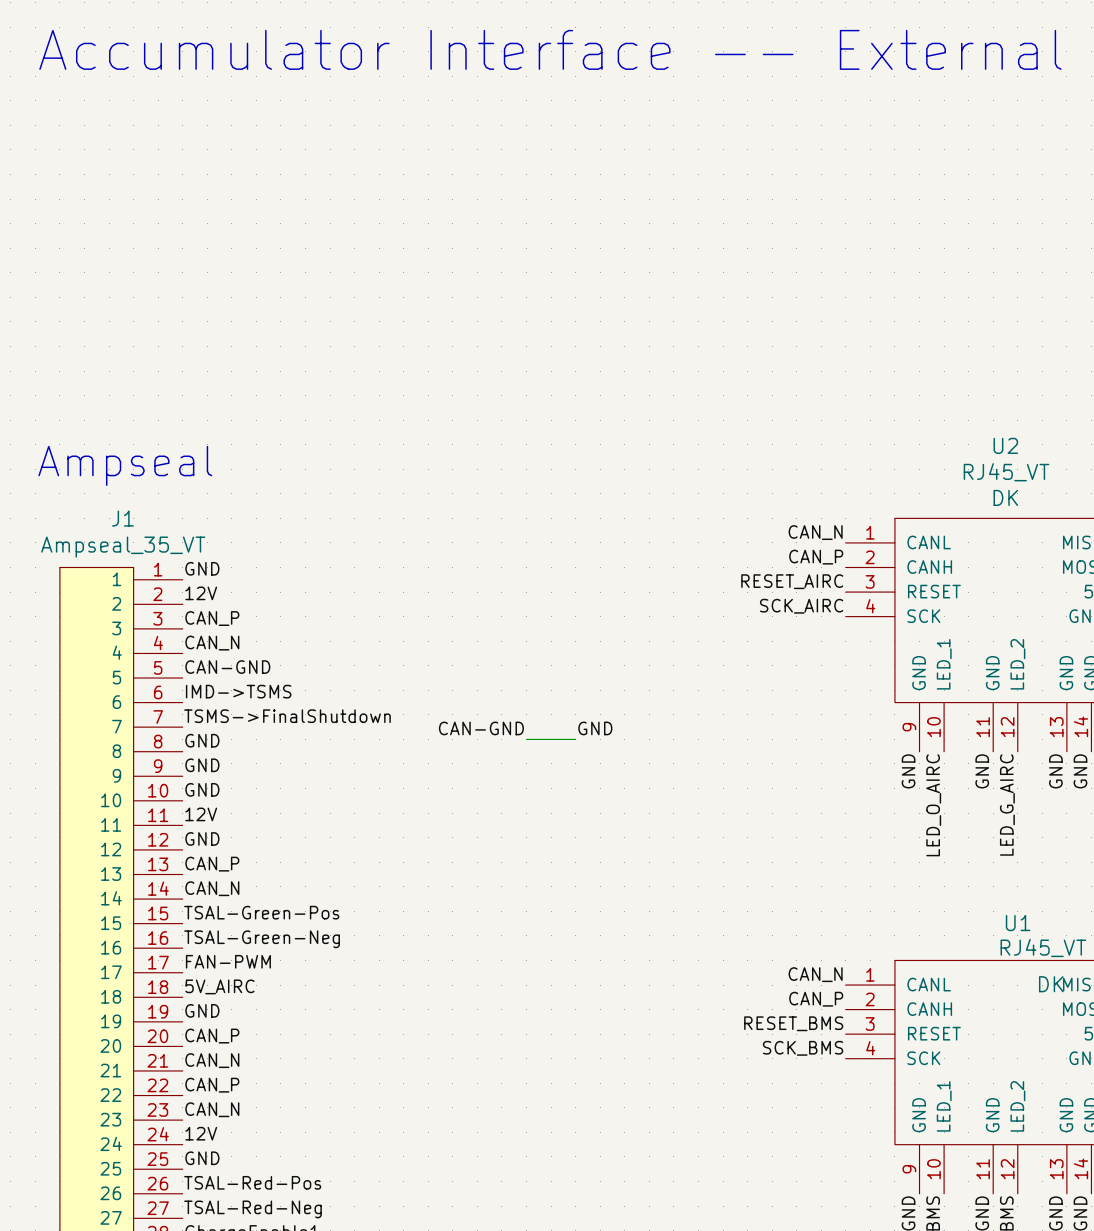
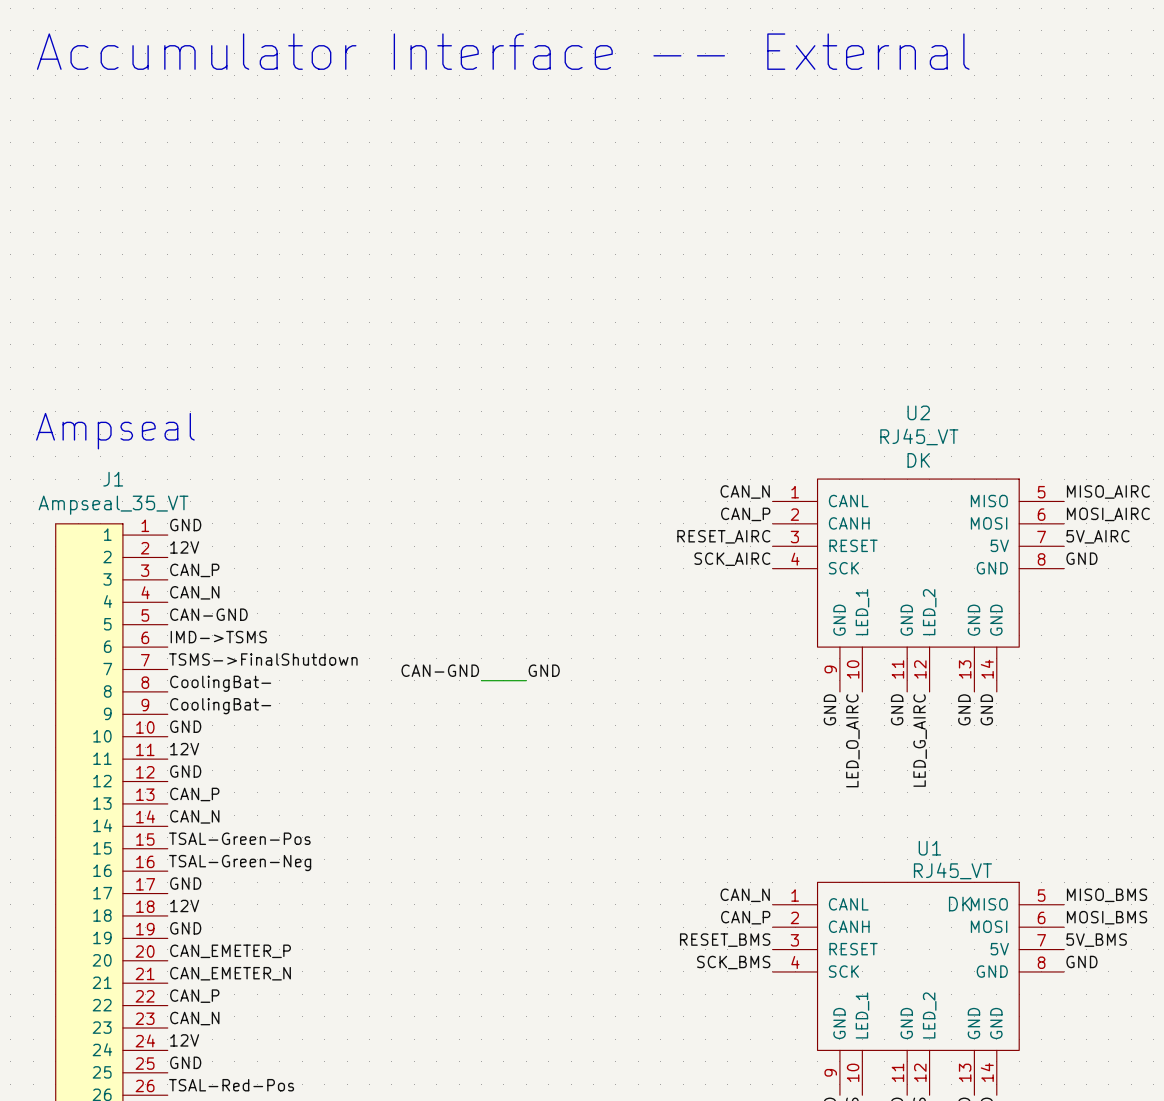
label: GND (202, 740) -> CoolingBat- (220, 683)
label: GND (202, 765) -> CoolingBat- (220, 706)
label: FAN-PWM (228, 961) -> GND (185, 883)
label: 5V_AIRC (219, 986) -> 12V (184, 905)
label: CAN_P (212, 1036) -> CAN_EMETER_P (230, 951)
label: CAN_N (212, 1060) -> CAN_EMETER_N (230, 973)

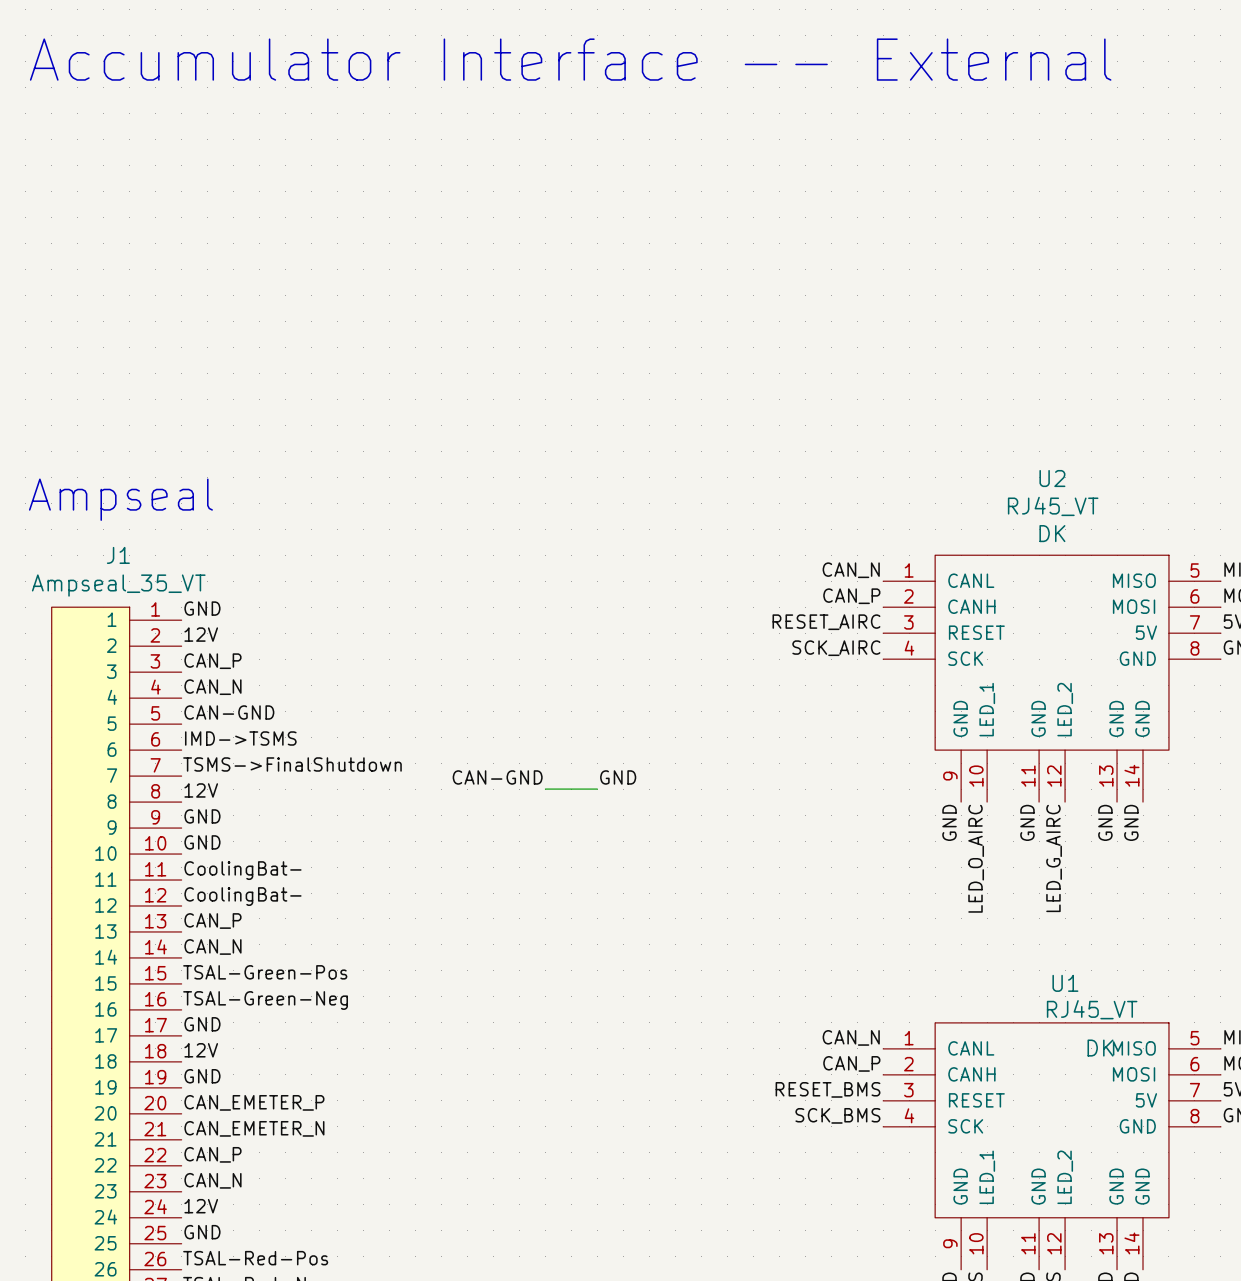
label: CoolingBat- (220, 683) -> 12V (201, 790)
label: CoolingBat- (220, 706) -> GND (202, 816)
label: 12V (184, 749) -> CoolingBat- (242, 870)
label: GND (185, 771) -> CoolingBat- (242, 896)

